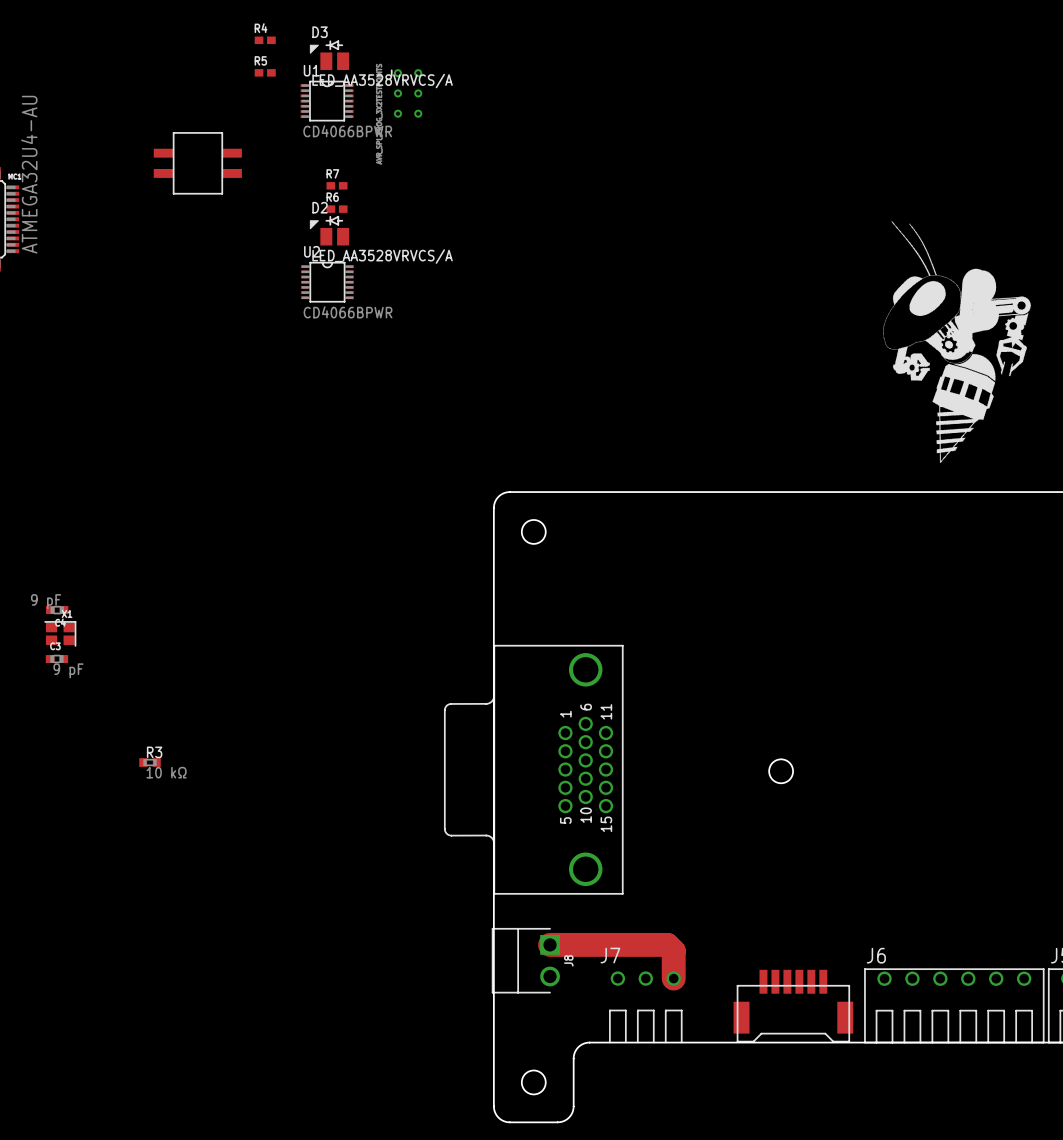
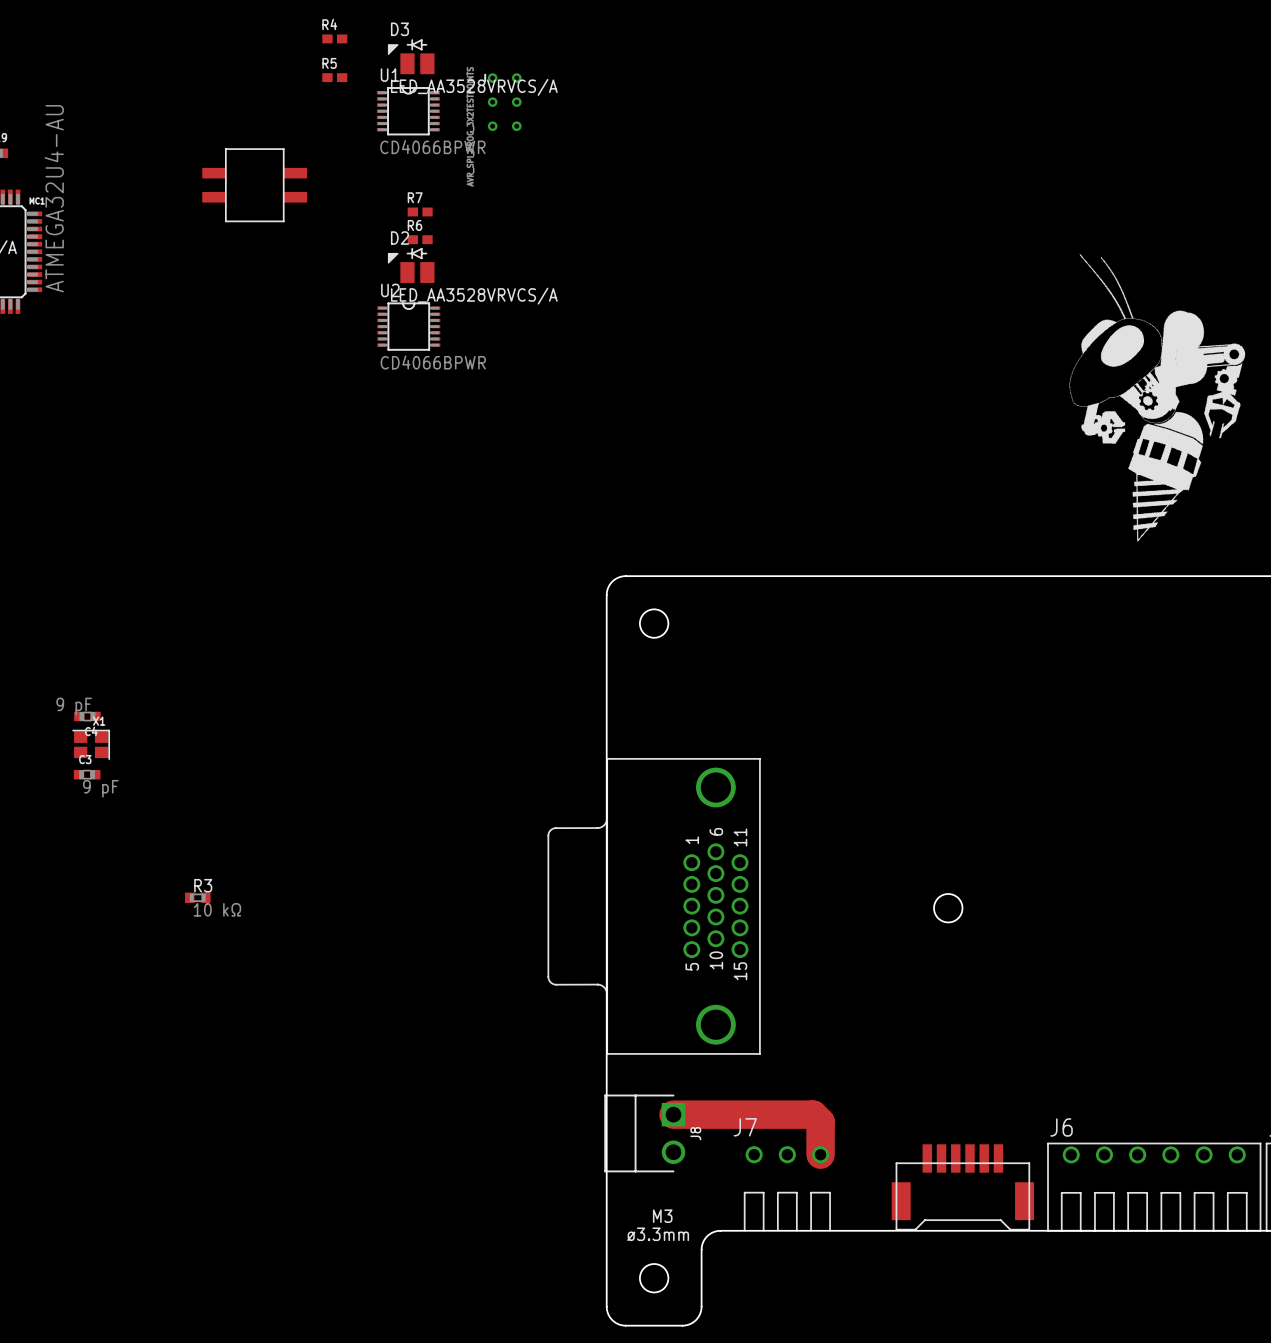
text: none -> M3 (662, 1216)
text: none -> ø3.3mm (658, 1234)

